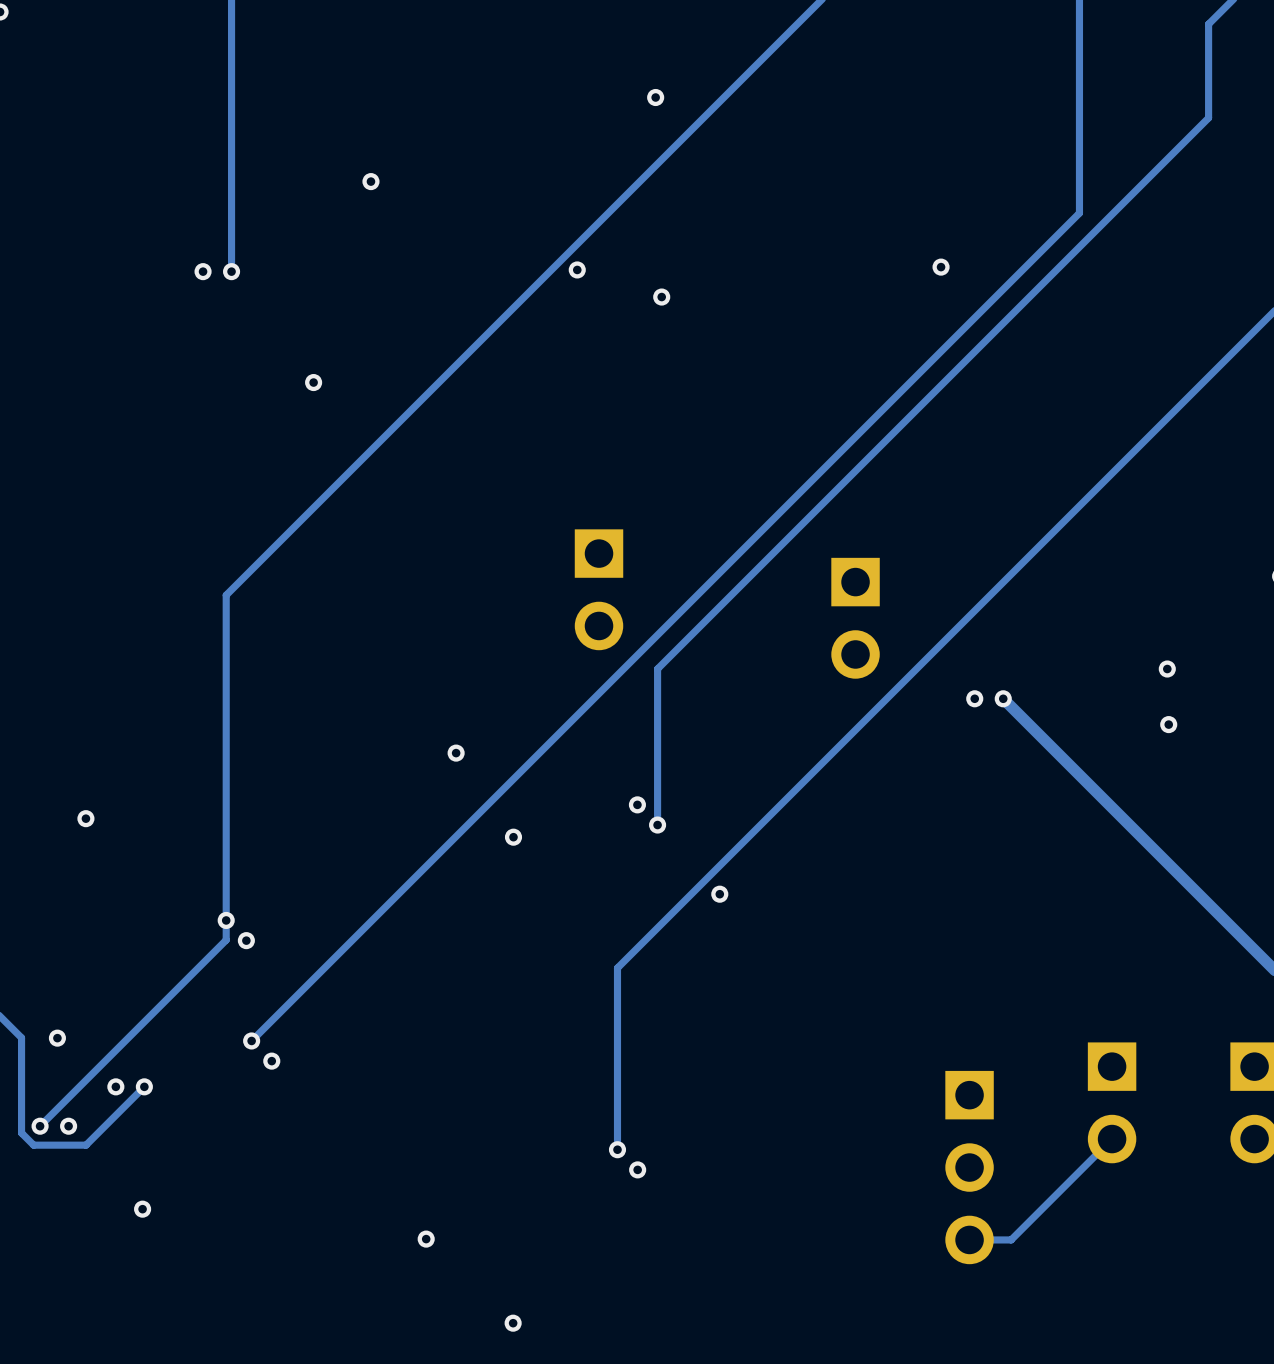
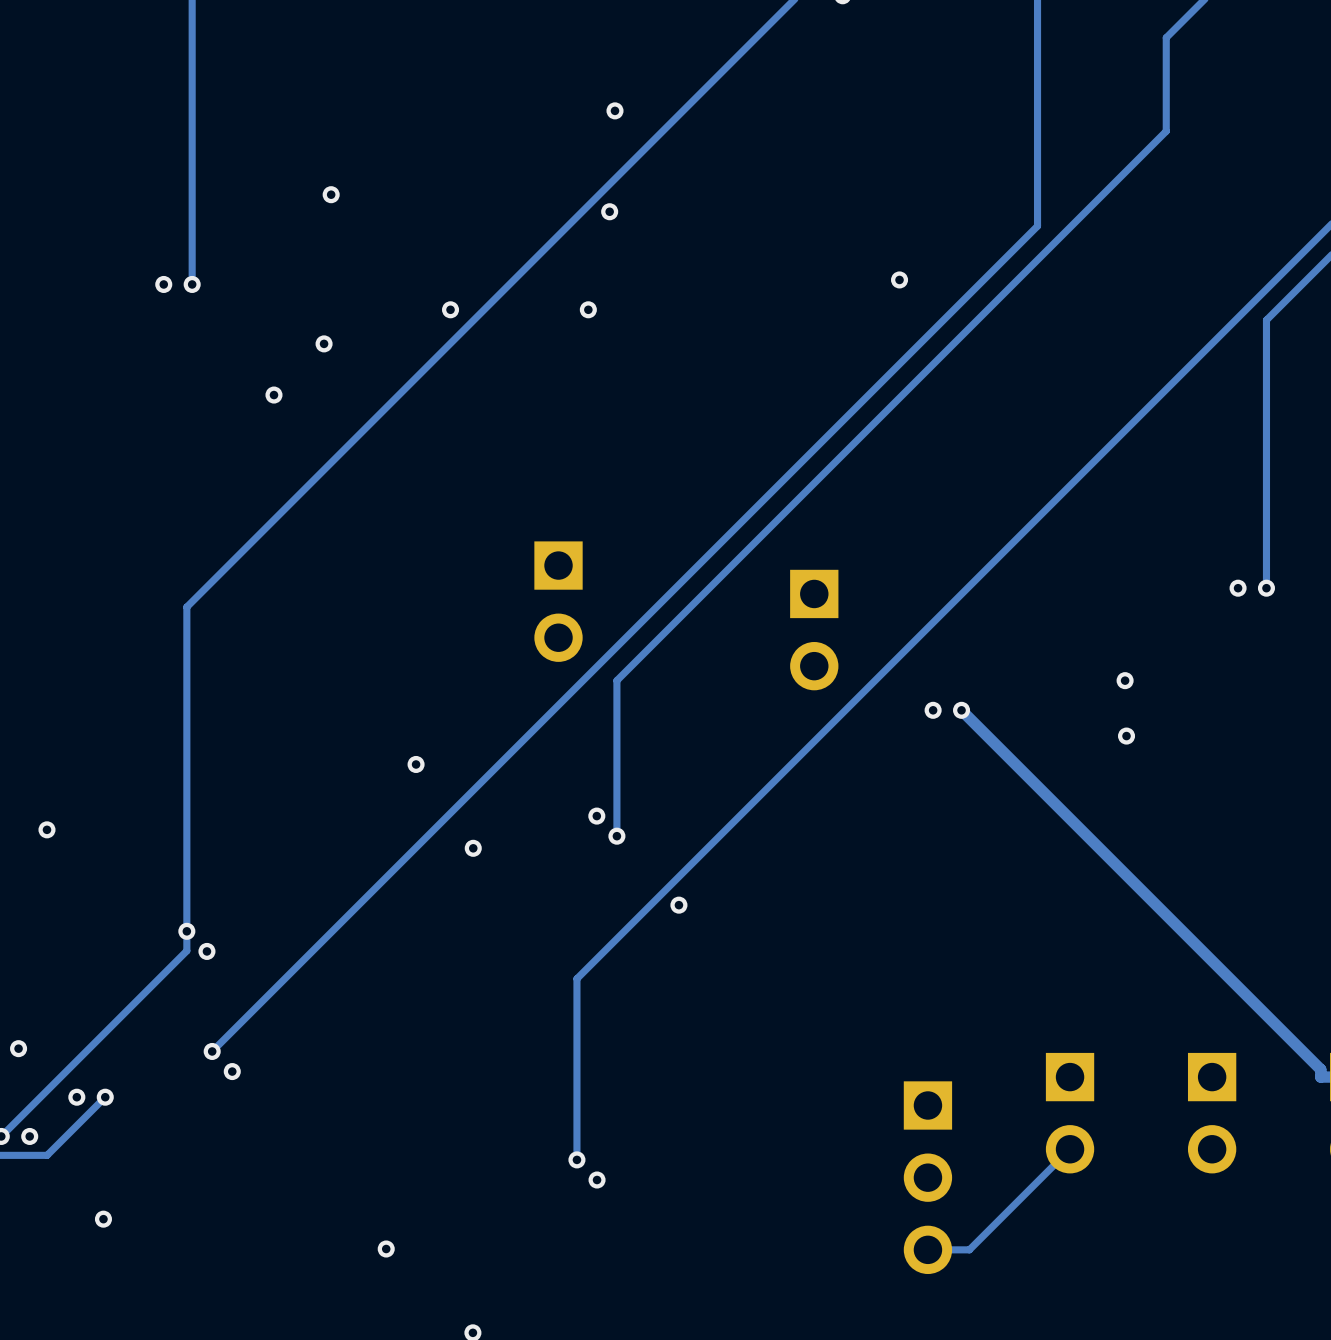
via: none -> (609, 211)
via: (577, 269) -> none
via: none -> (450, 309)
via: none -> (588, 309)
via: (661, 297) -> none
via: none -> (324, 343)

